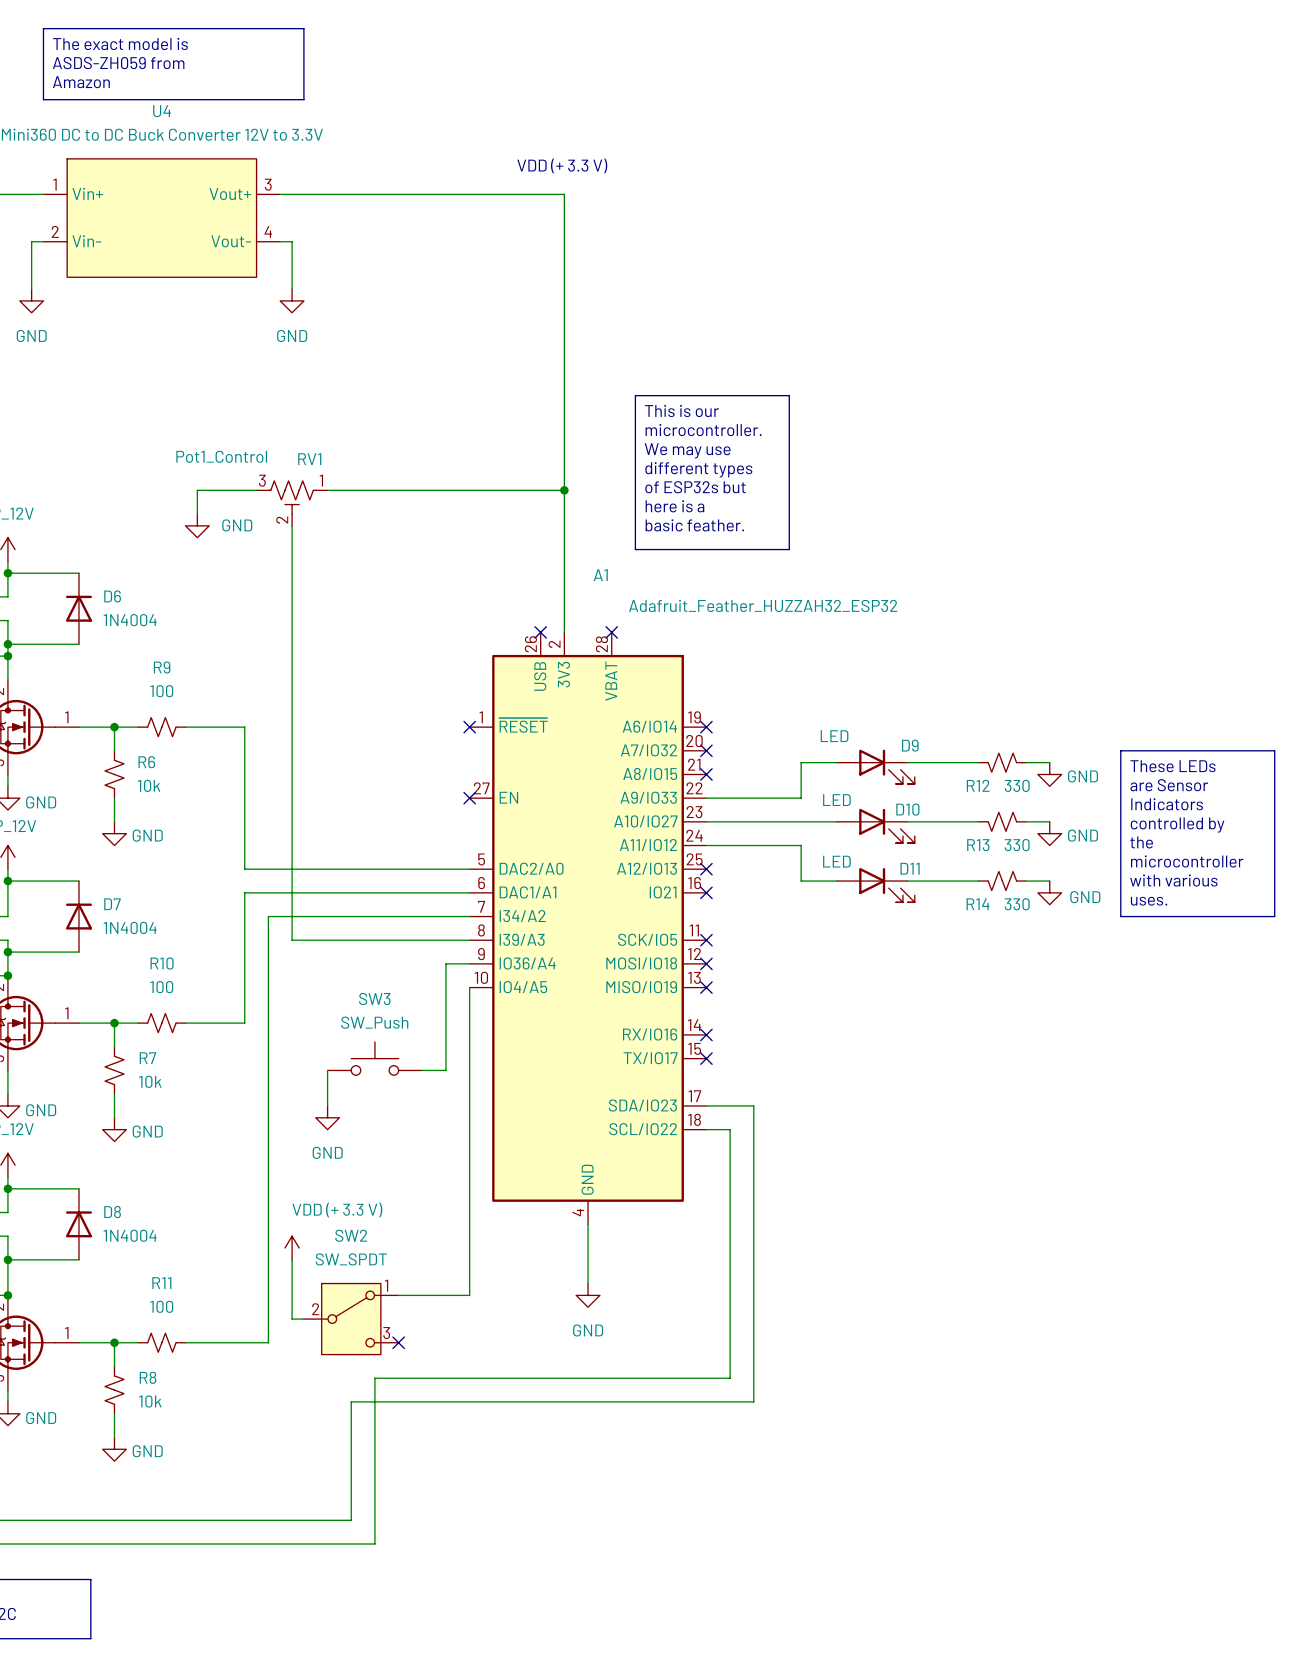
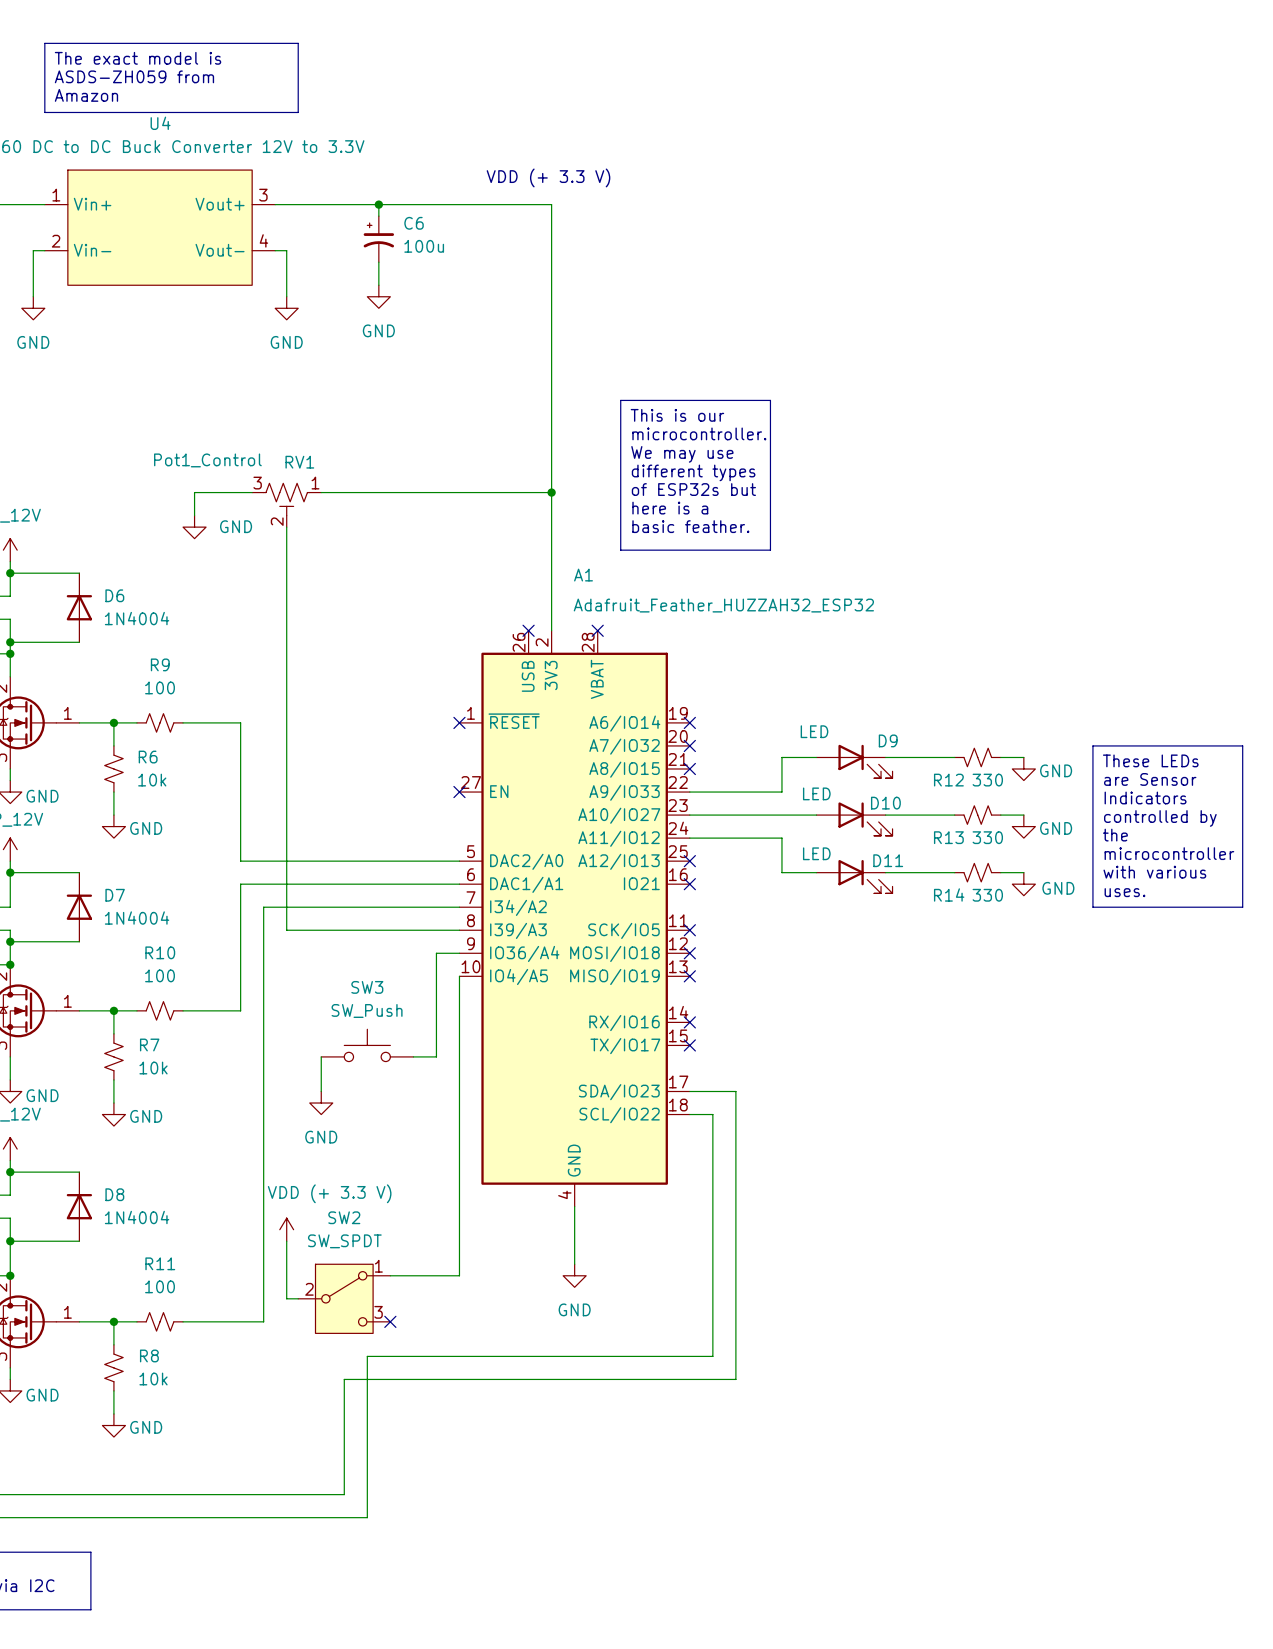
wire: none -> (378, 204) (378, 216)
junction: none -> (378, 204)
C6: none -> 100u (378, 239)
wire: none -> (378, 262) (378, 285)
power symbol: none -> GND (378, 296)

